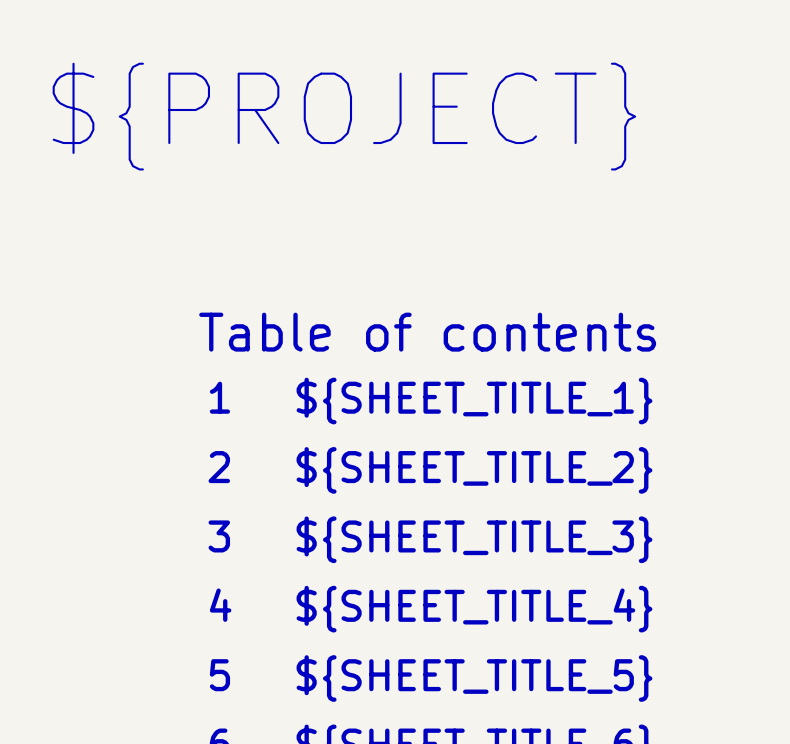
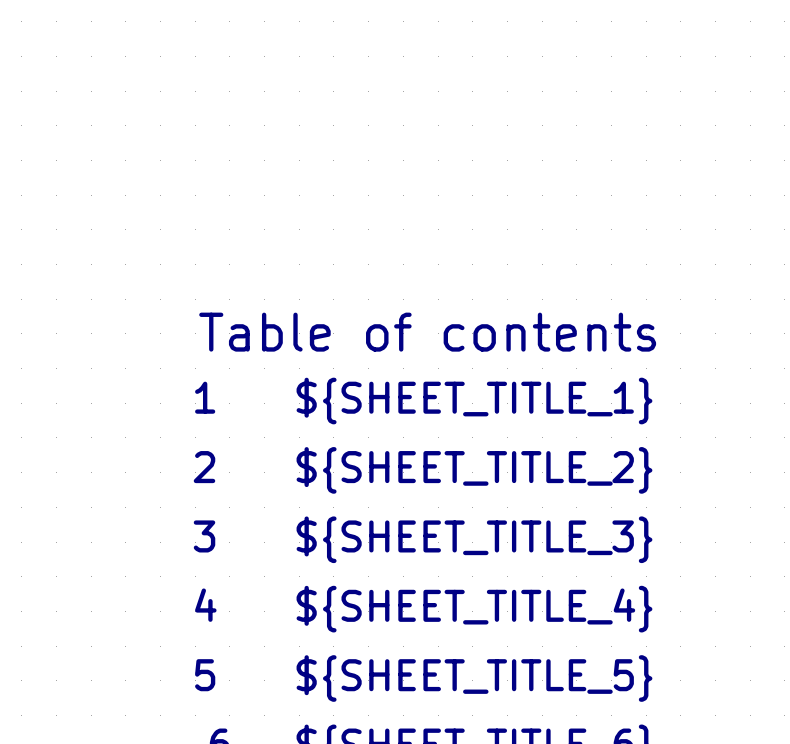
text: ${PROJECT} (344, 116) -> none
text position: 1 (219, 397) -> 1 (205, 397)
text position: 2 (219, 467) -> 2 (204, 467)
text position: 3 (219, 536) -> 3 (204, 536)
text position: 4 (220, 605) -> 4 (205, 605)
text position: 5 (219, 675) -> 5 (205, 675)

